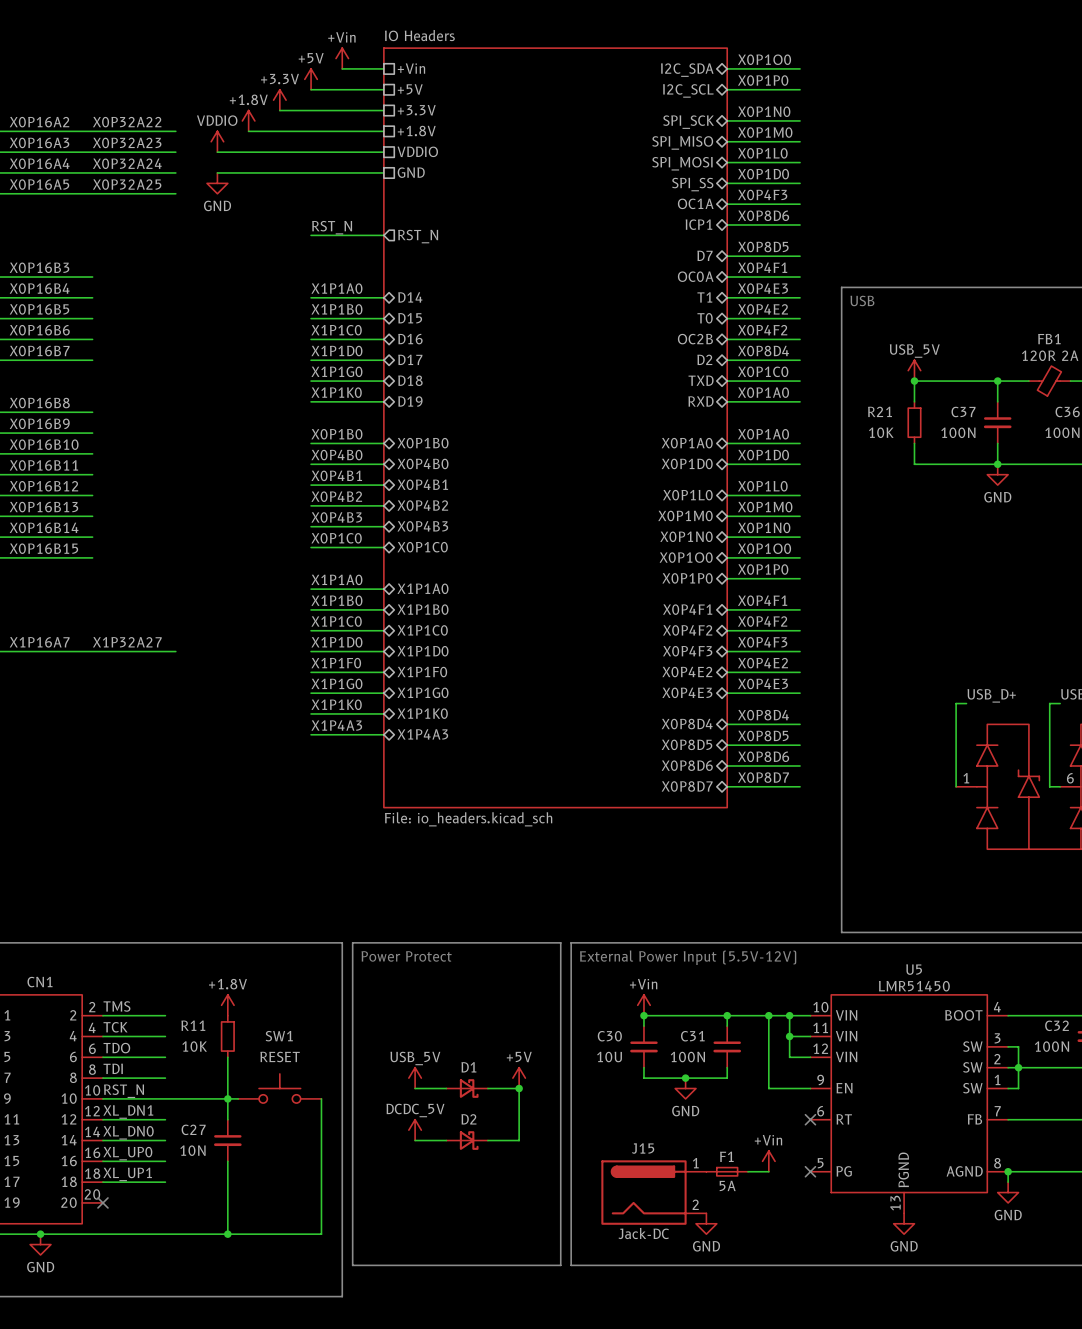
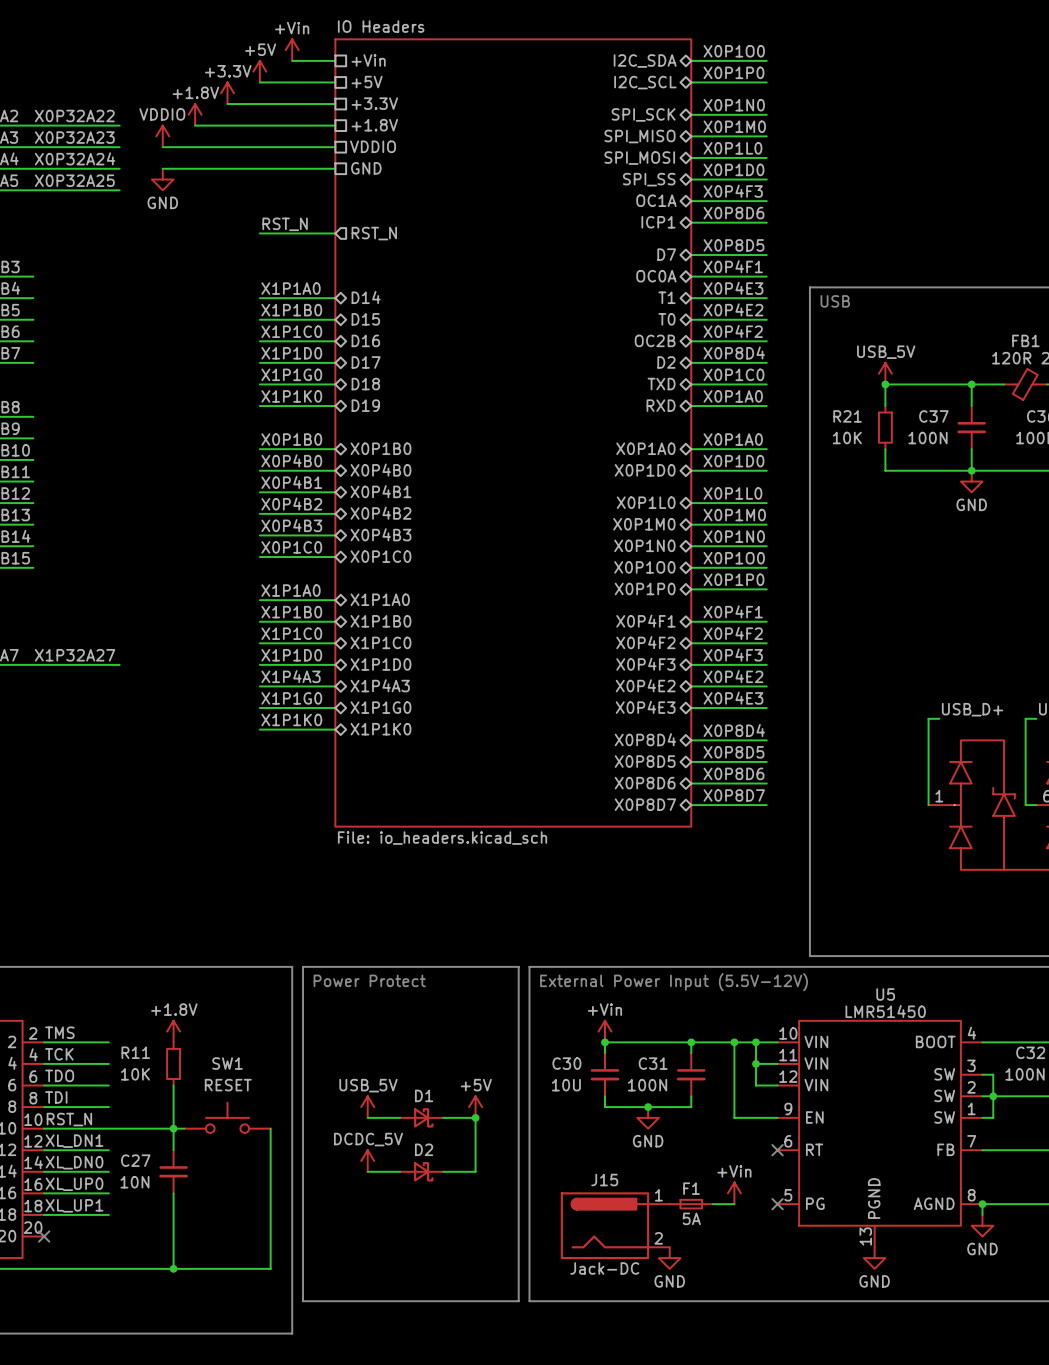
label: X1P1F0 (336, 663) -> X1P4A3 (291, 676)
sheet pin: X1P1F0 (422, 672) -> X1P4A3 (380, 685)
label: X1P4A3 (336, 725) -> none
wire: (311, 734) (383, 734) -> none
sheet pin: X1P4A3 (422, 734) -> none

